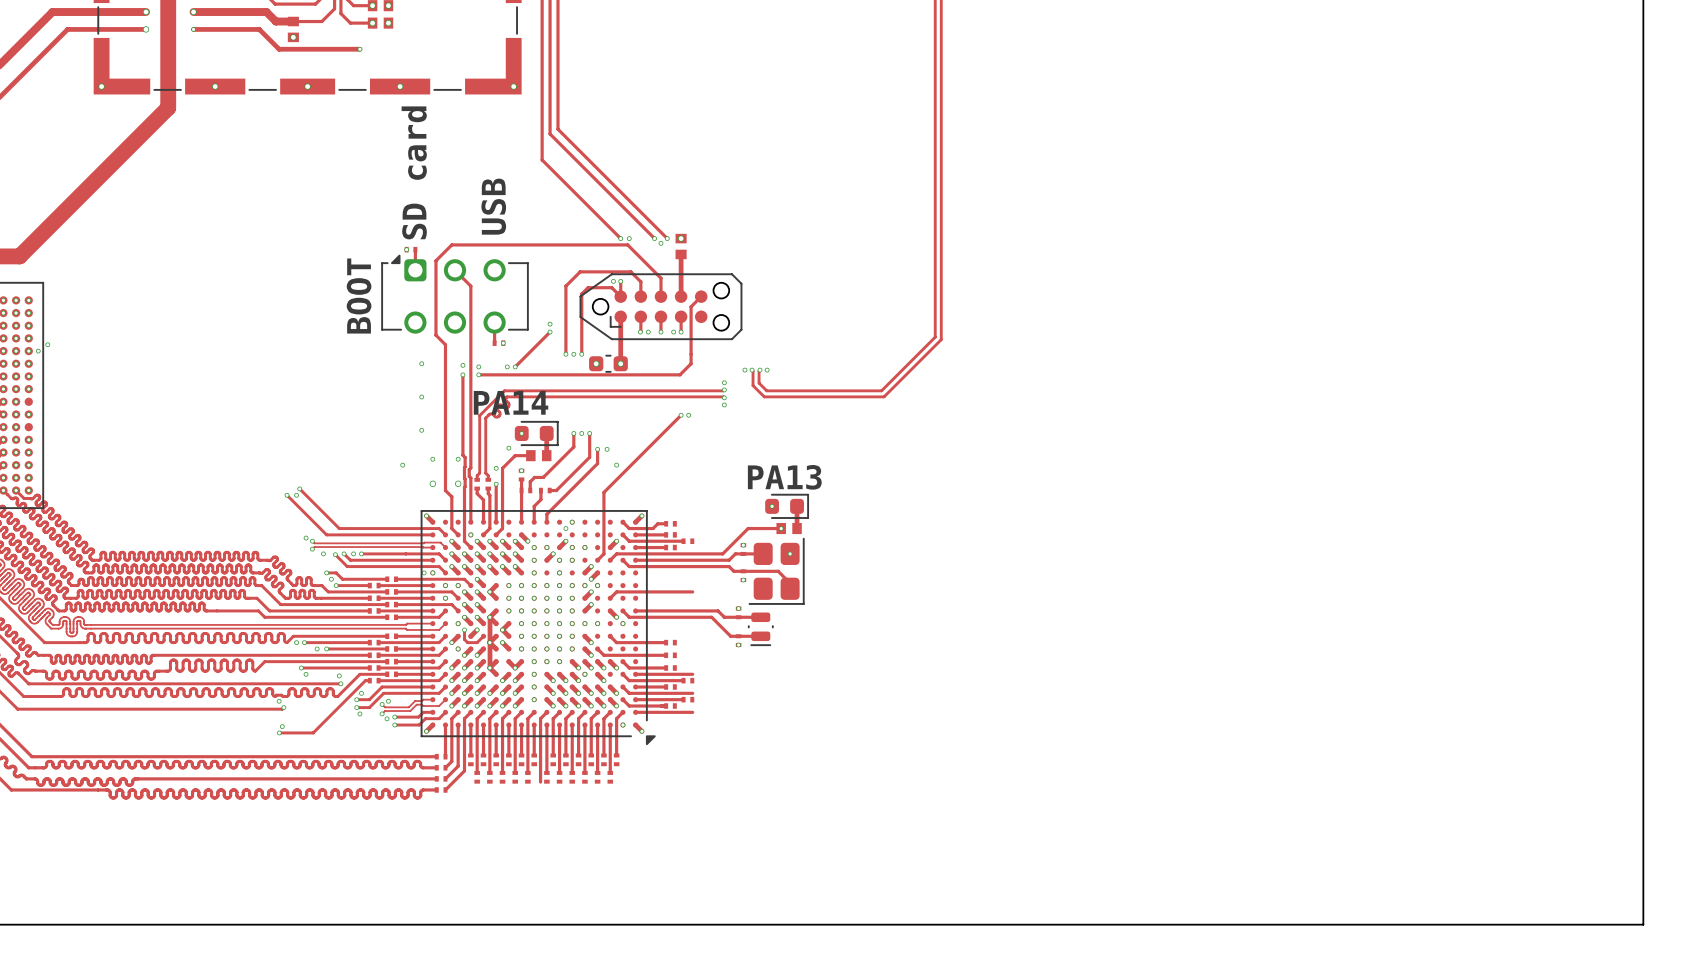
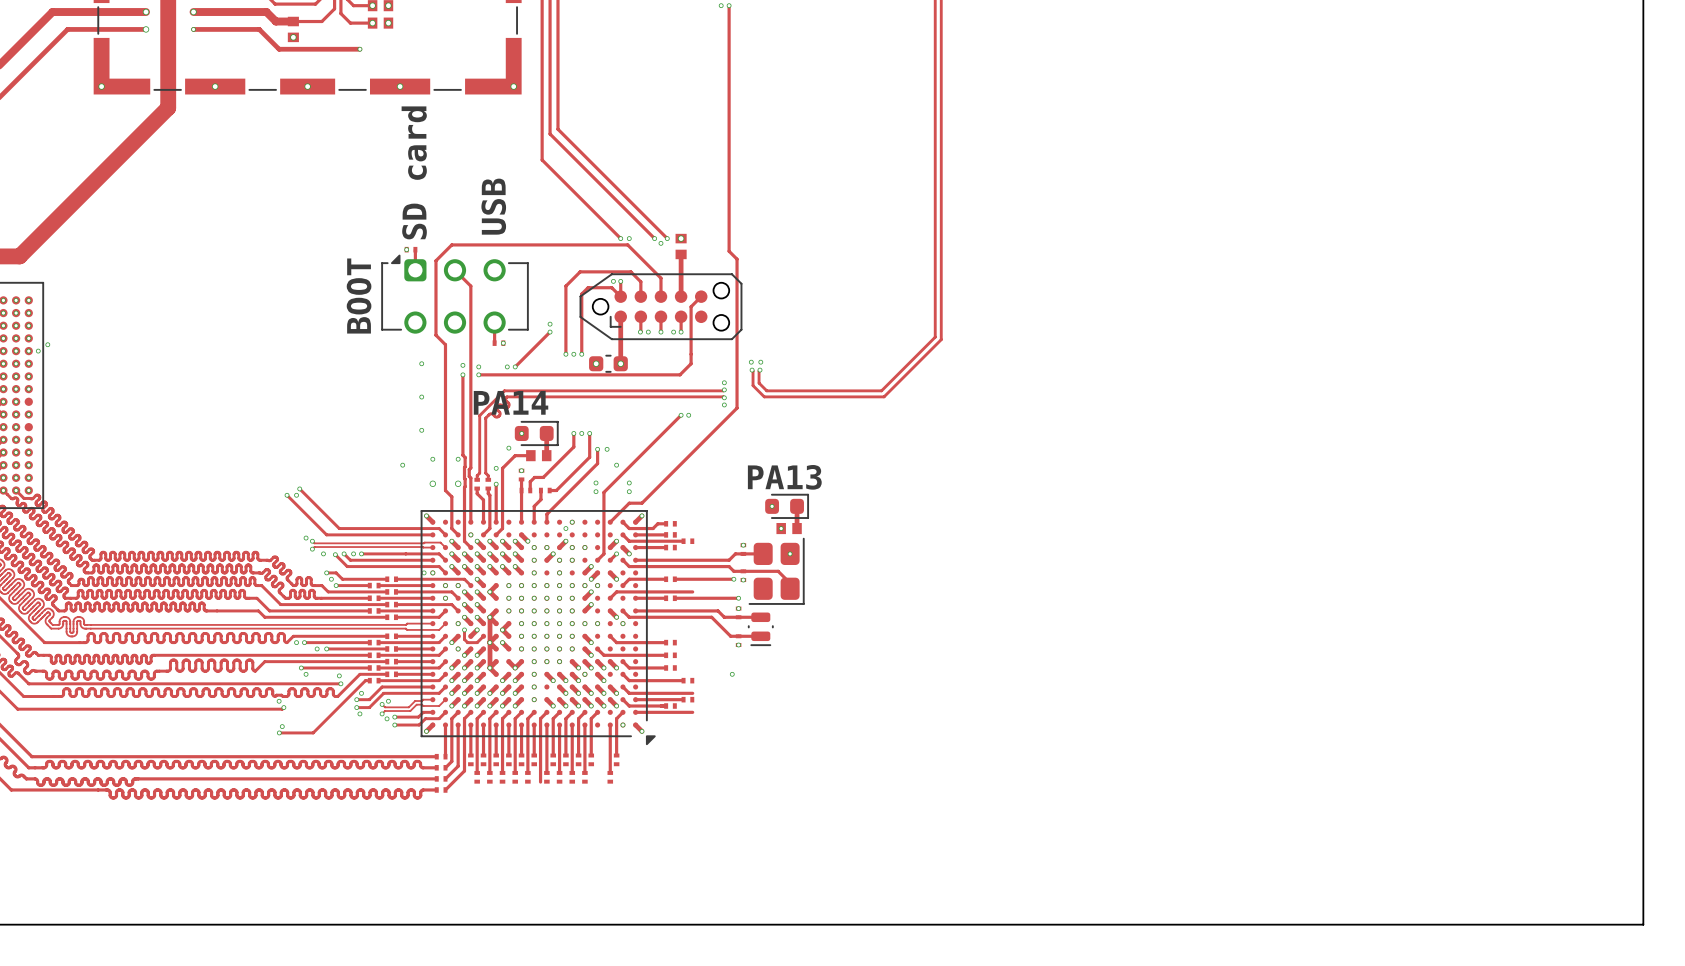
via: none -> (721, 5)
track: none -> (729, 5) (729, 251) (737, 259) (737, 408) (641, 503) (629, 503) (610, 522)
via: none -> (729, 5)
via: none -> (751, 362)
via: none -> (760, 362)
via: (744, 370) -> none
via: (767, 370) -> none
via: none -> (596, 482)
via: none -> (629, 482)
via: none -> (596, 491)
via: none -> (629, 491)
track: (781, 528) (748, 528) (722, 553) (616, 553) -> none
track: none -> (622, 547) (629, 553)
via: none -> (616, 553)
via: none -> (629, 553)
via: none -> (616, 579)
track: none -> (666, 579) (629, 579) (622, 585)
part: none -> (670, 579)
track: none -> (674, 579) (733, 579)
via: none -> (733, 579)
part: none -> (670, 598)
track: none -> (674, 598) (738, 598)
via: none -> (738, 598)
track: (635, 674) (692, 674) -> none
via: none -> (732, 674)
track: (546, 686) (553, 693) -> (610, 572) (616, 579)
track: (635, 686) (666, 686) -> (635, 598) (666, 598)
part: (670, 686) -> none
via: (553, 693) -> none
track: (610, 712) (603, 718) (603, 755) -> none
track: (597, 725) (597, 772) -> none
part: (603, 759) -> none
part: (597, 777) -> none

